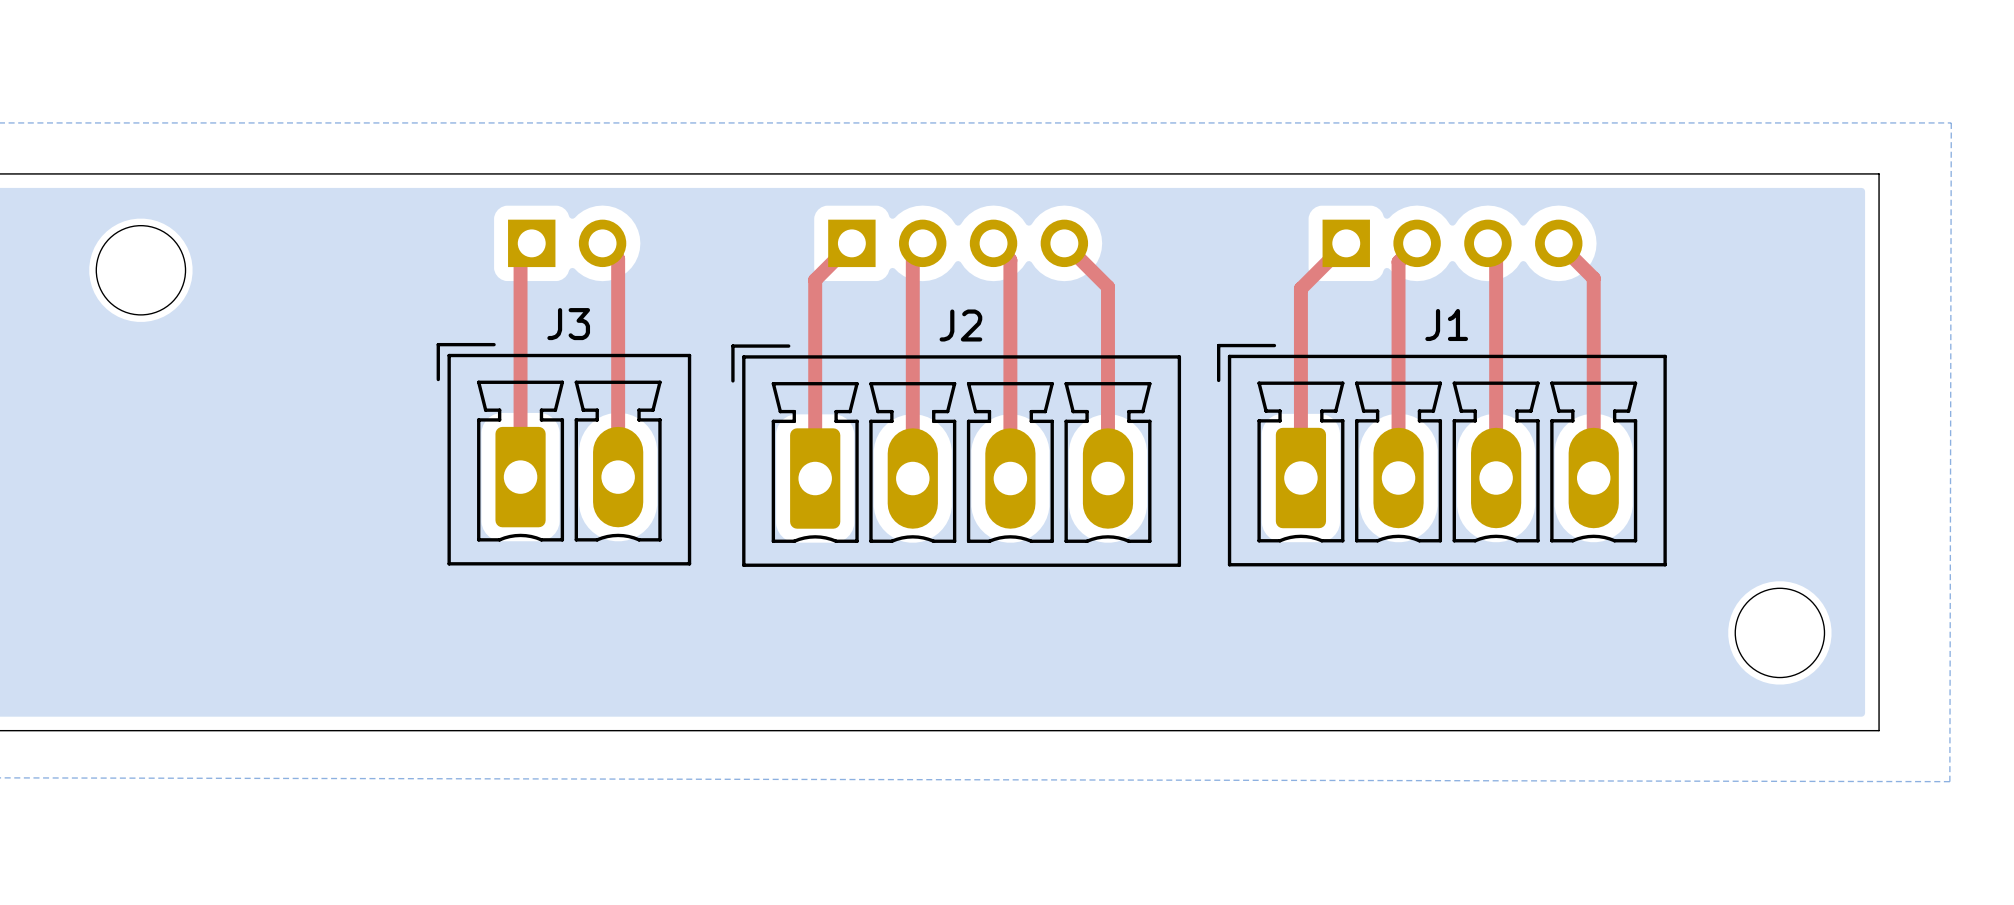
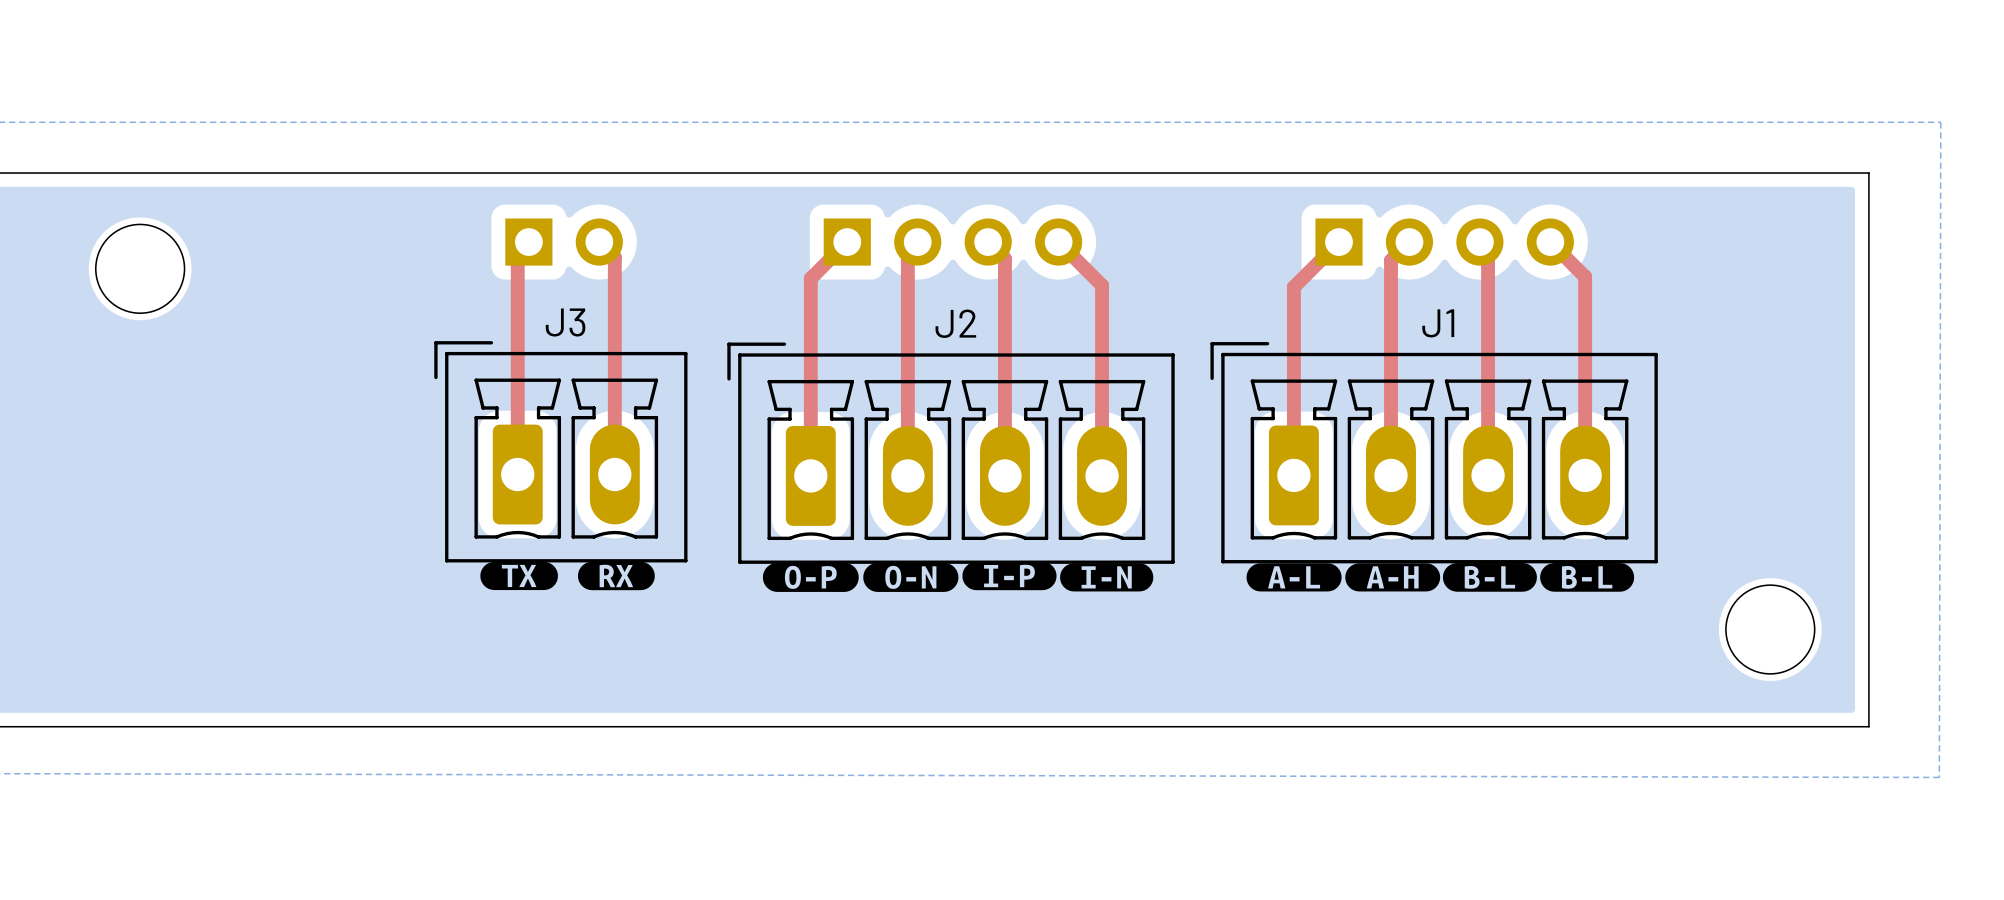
drawing: none -> [480, 561, 655, 591]
drawing: none -> [762, 561, 1154, 592]
drawing: none -> [1246, 563, 1635, 592]

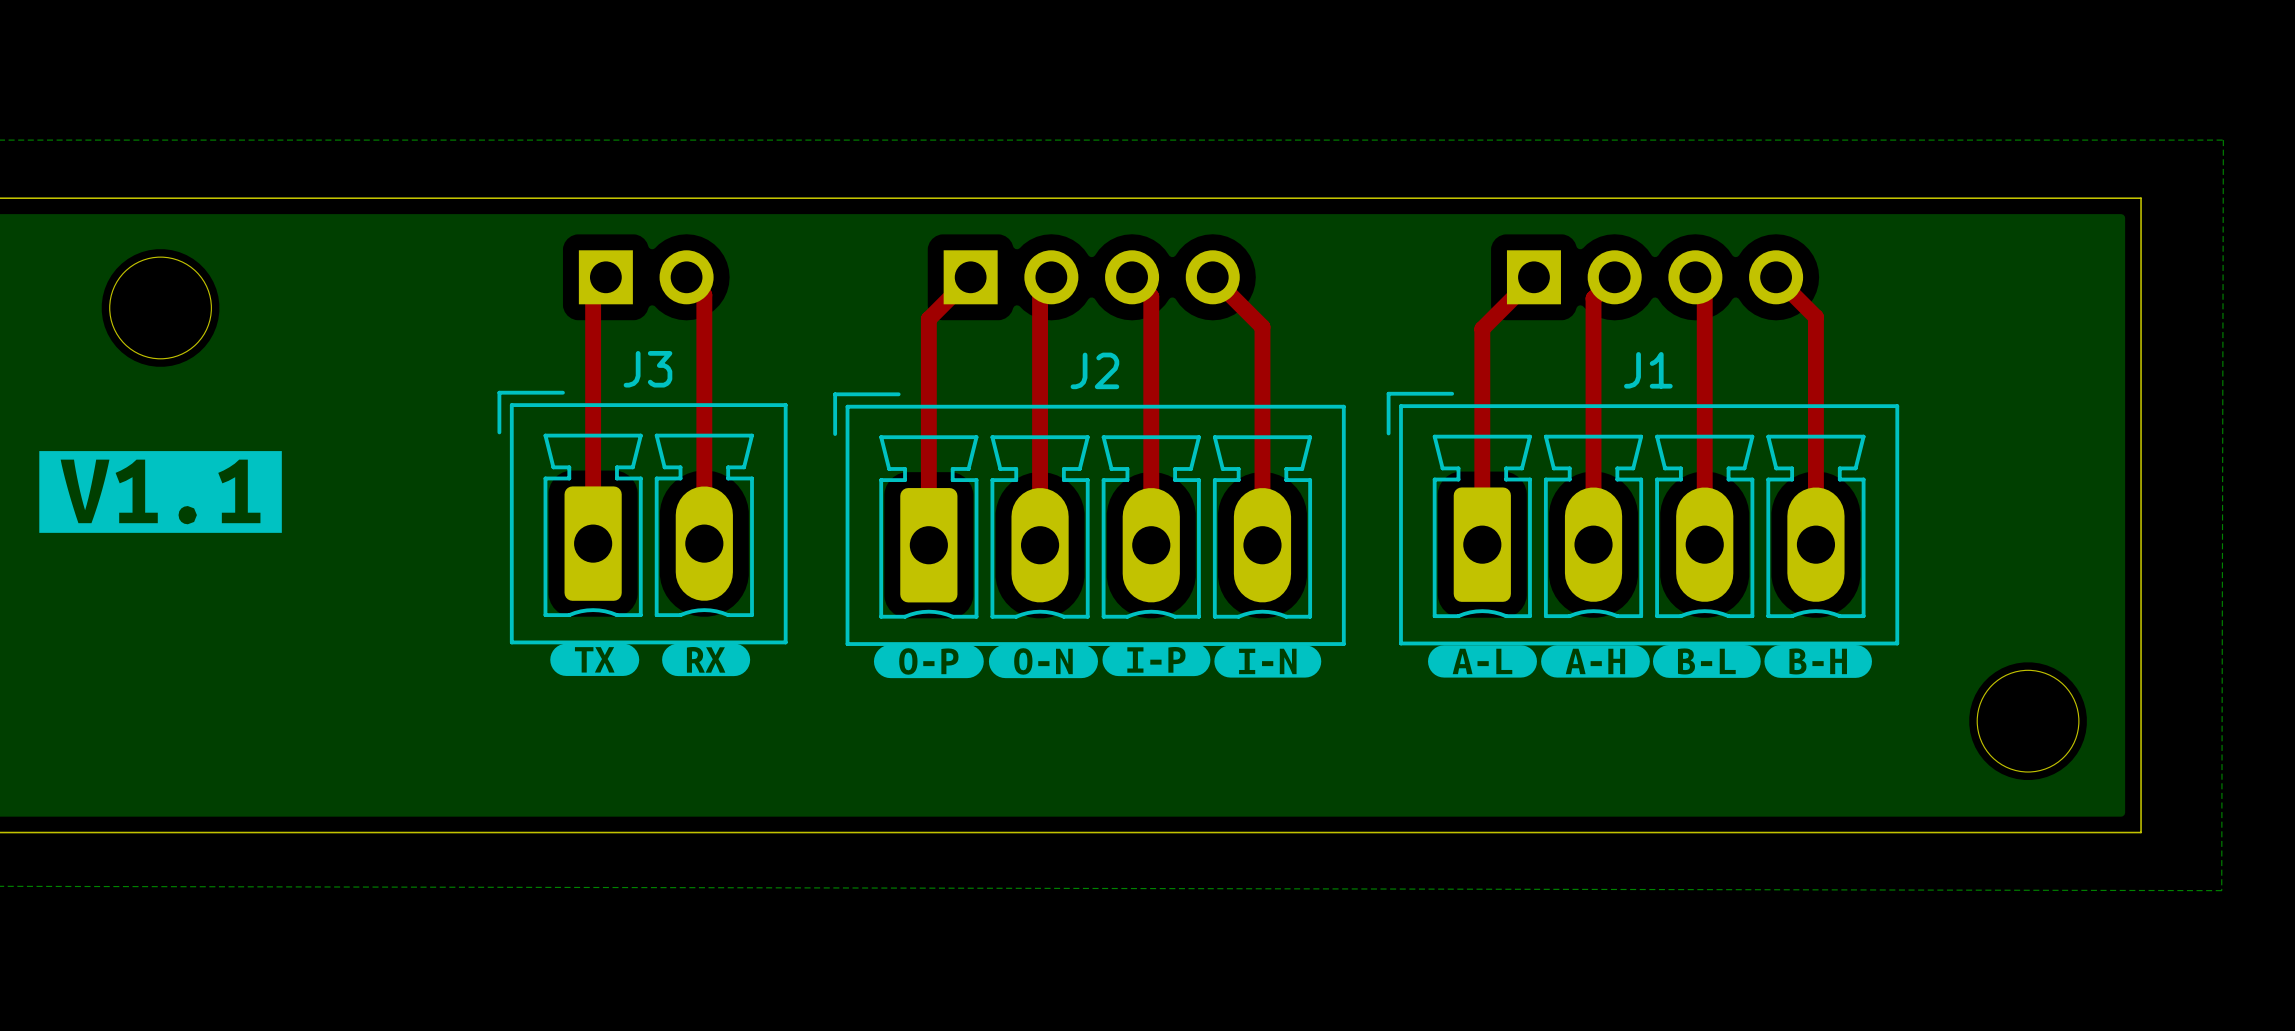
drawing: none -> [39, 451, 282, 533]
drawing shape: [1540, 563, 1635, 592] -> [1764, 645, 1872, 678]

